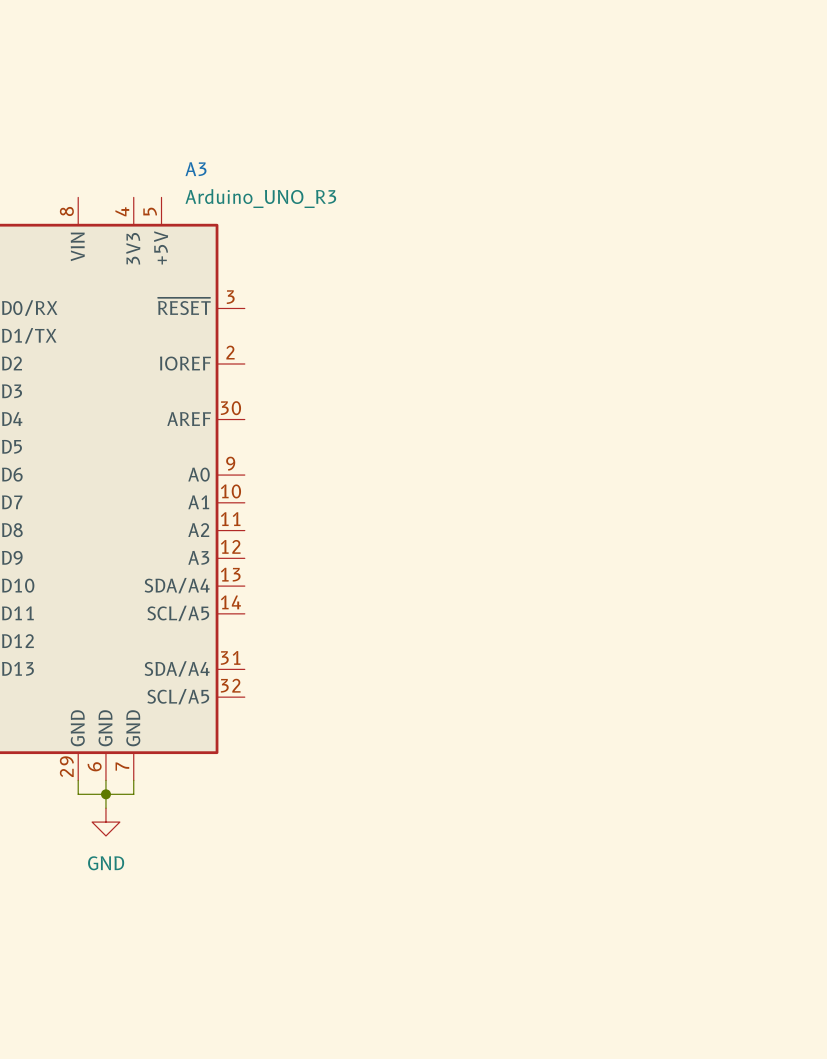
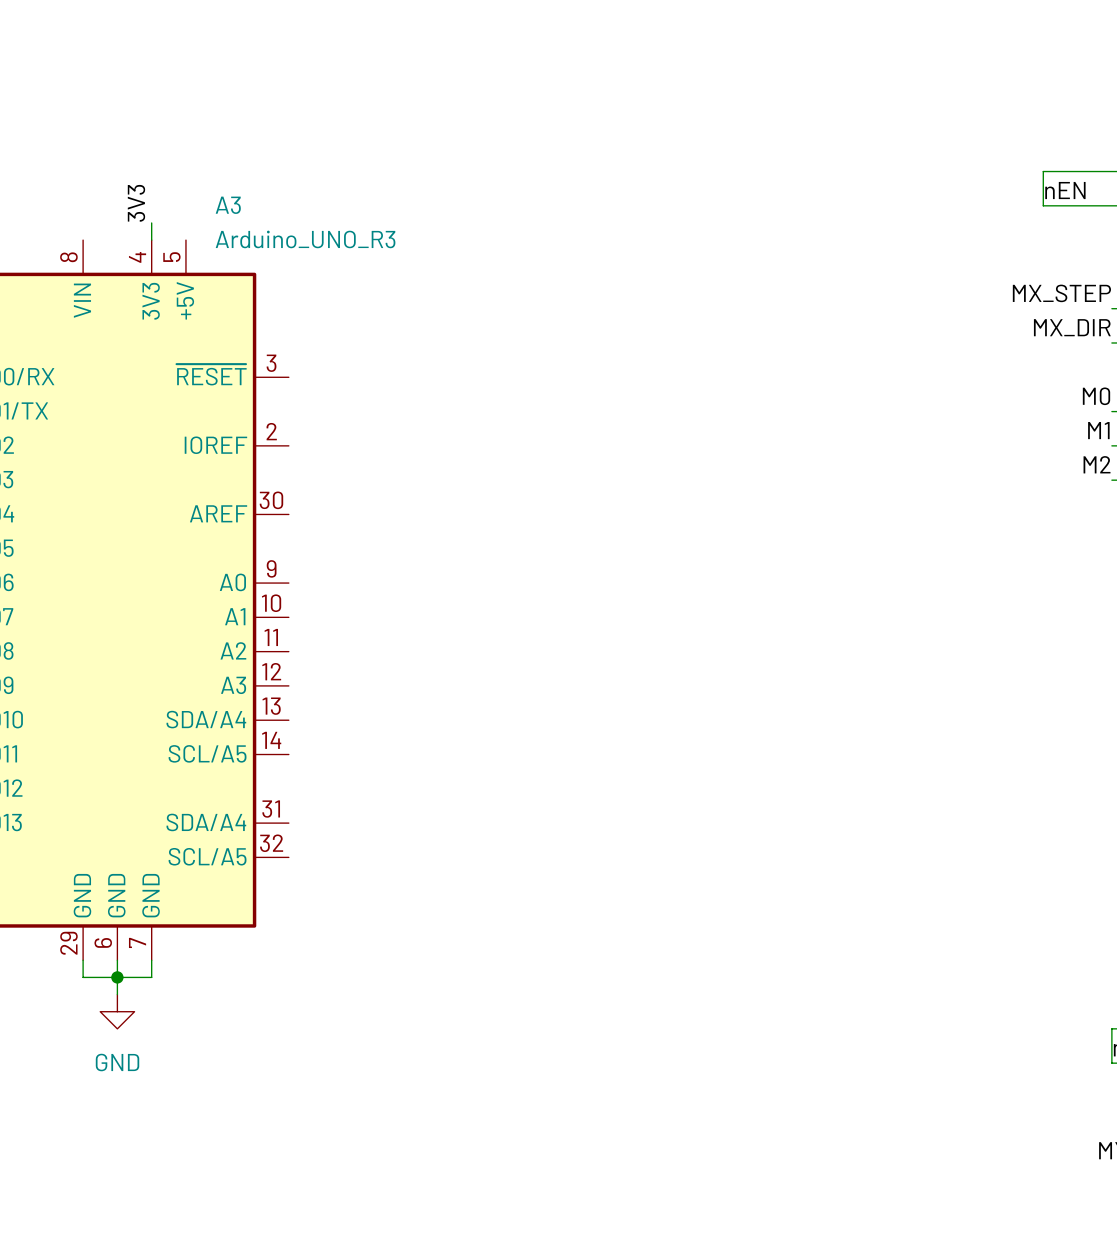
label: none -> 3V3 (136, 203)
wire: none -> (151, 222) (151, 240)

